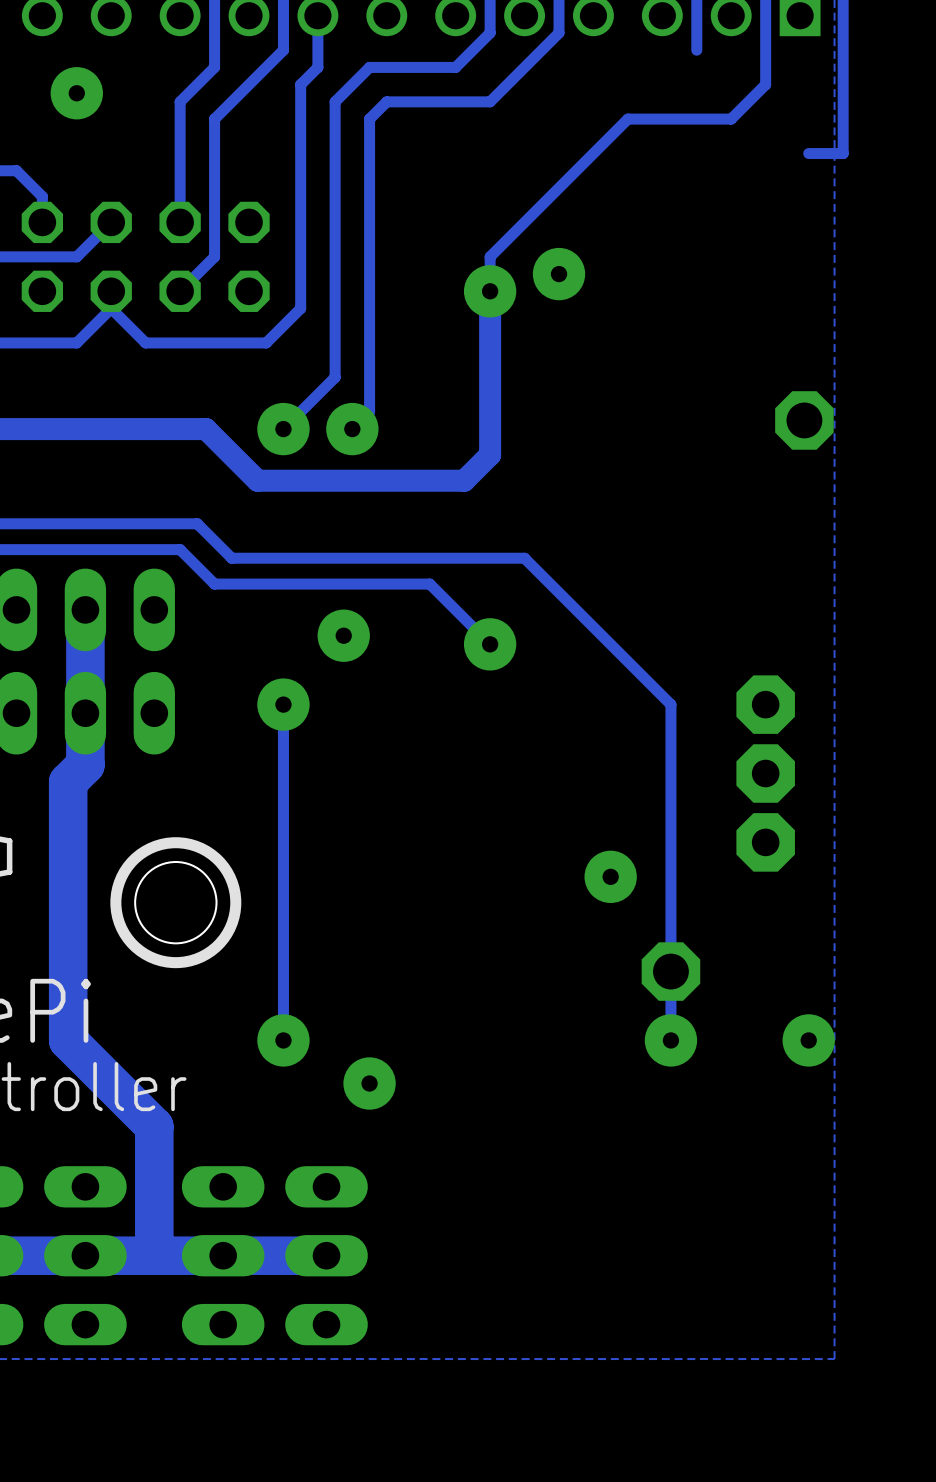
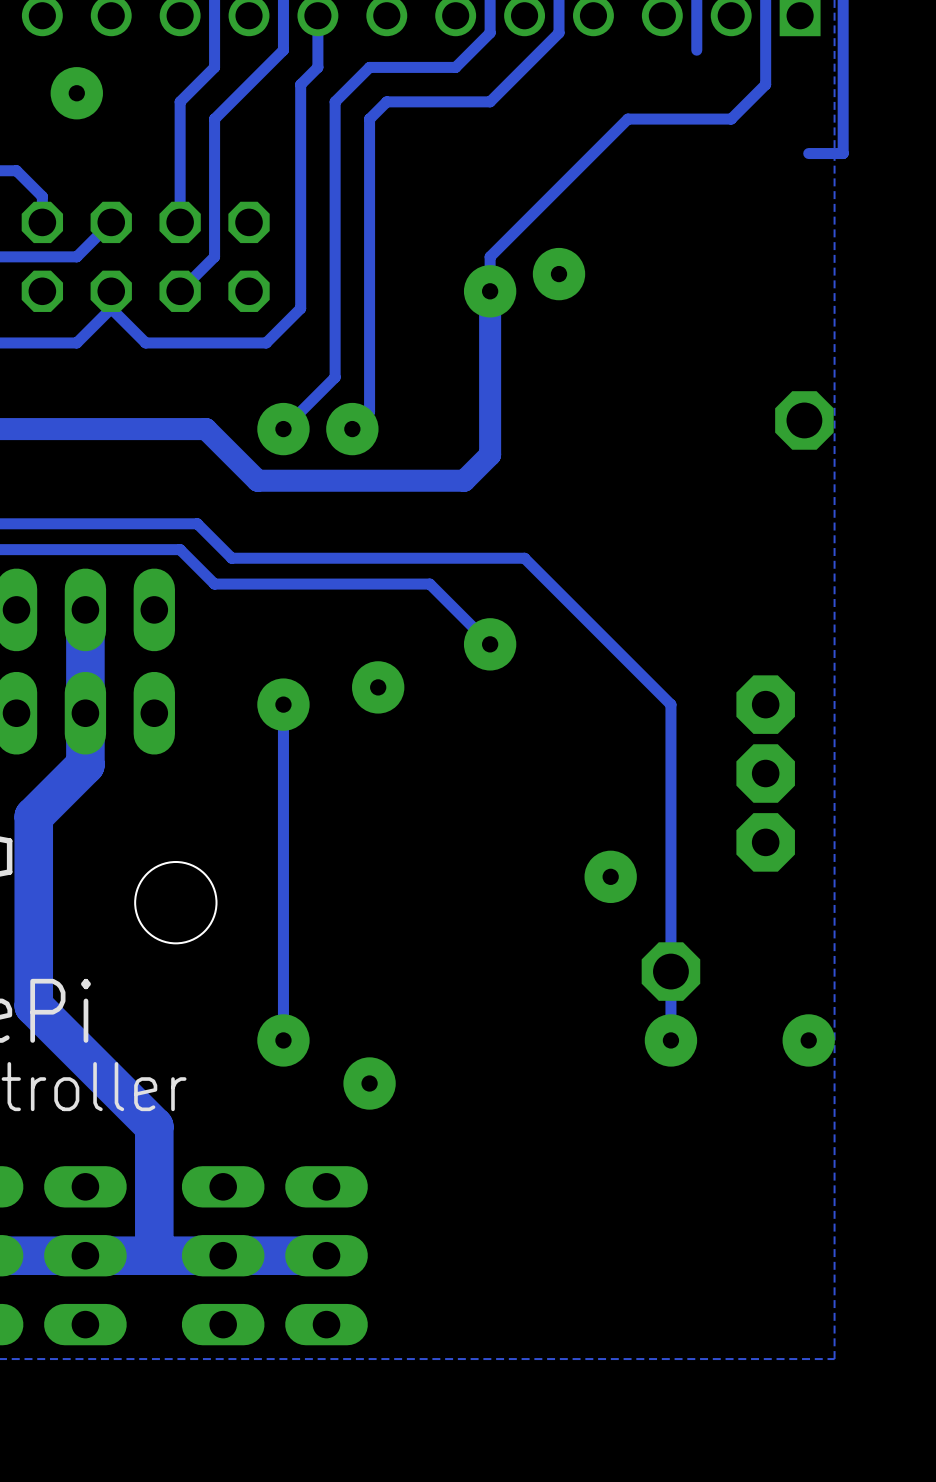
via position: (343, 635) -> (378, 687)
track: (68, 782) (68, 1040) -> (68, 782) (33, 816) (33, 1006) (68, 1040)
drawing: [110, 837, 242, 969] -> none

